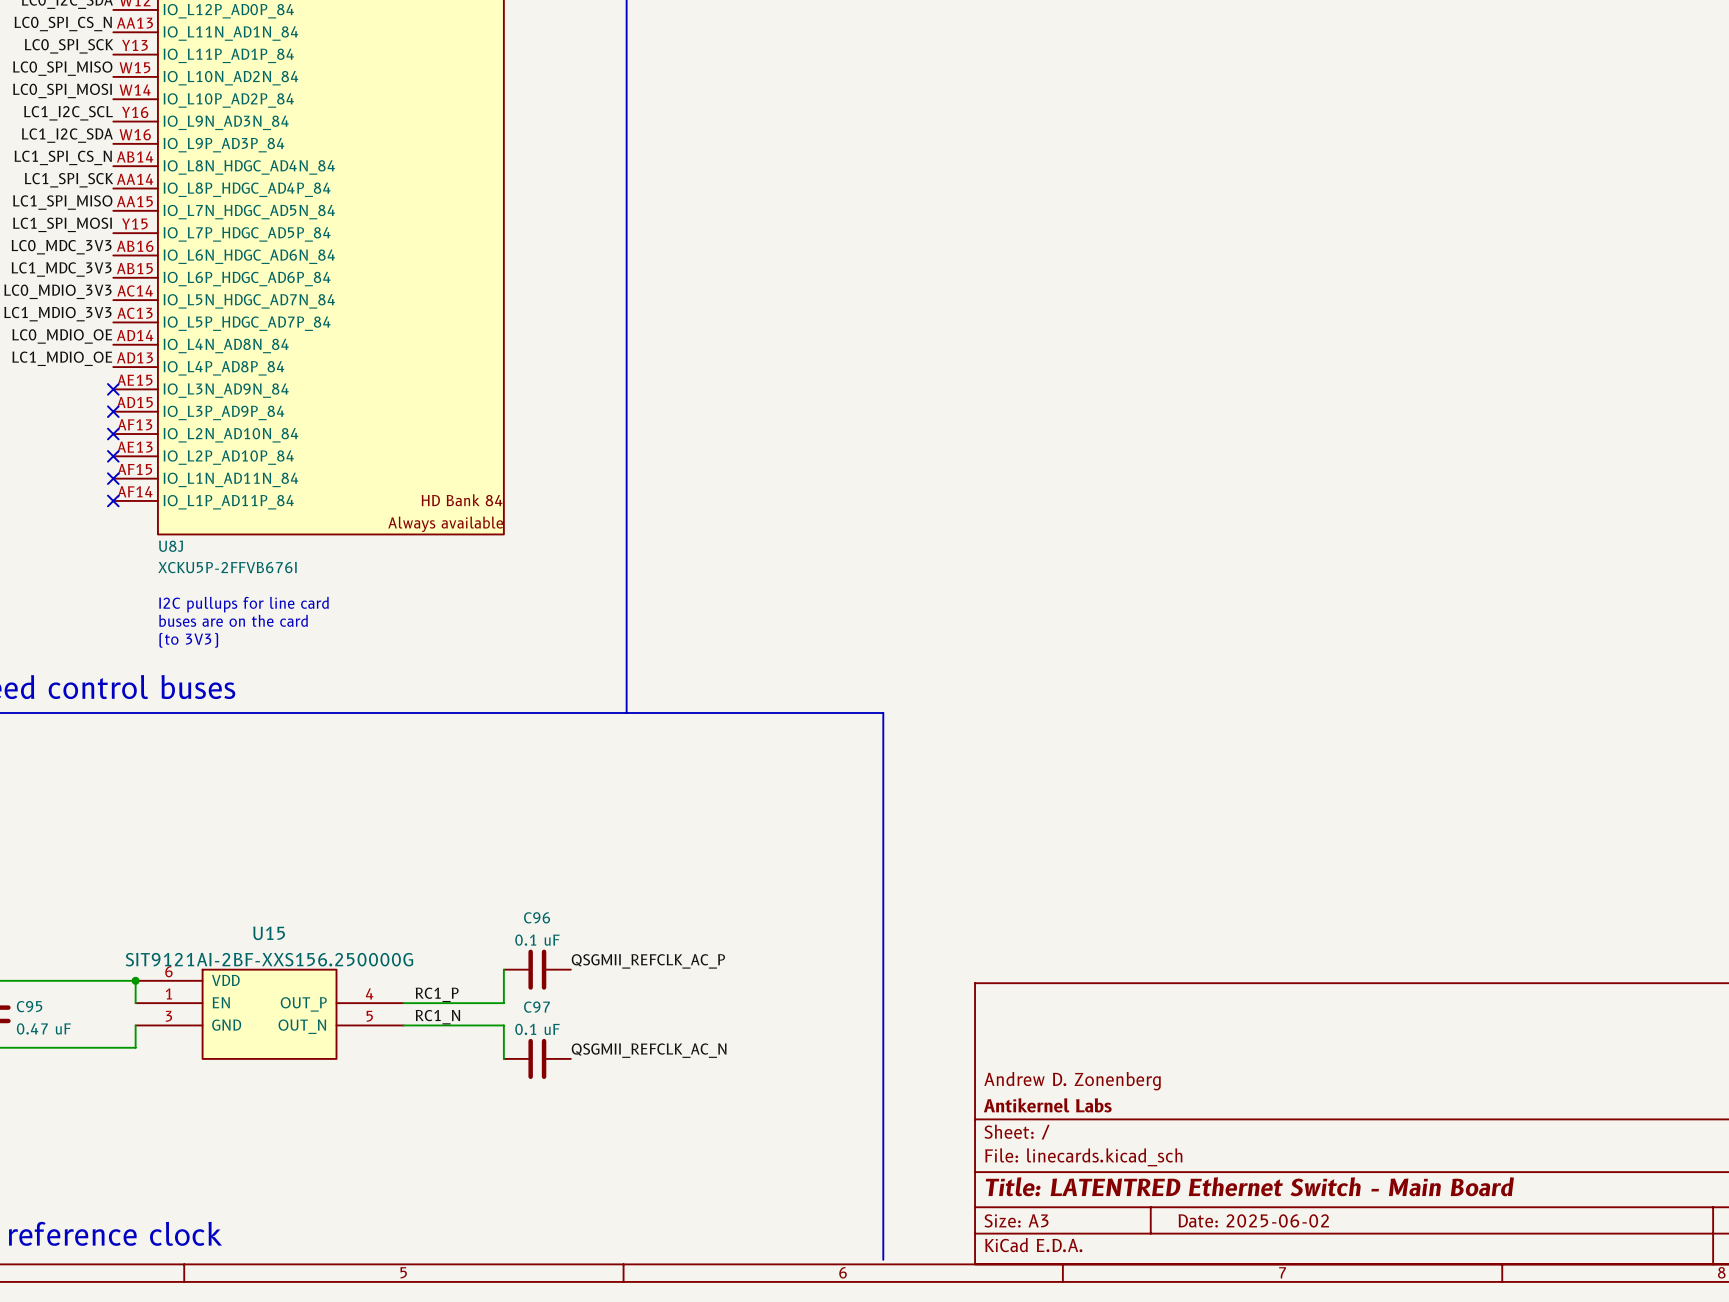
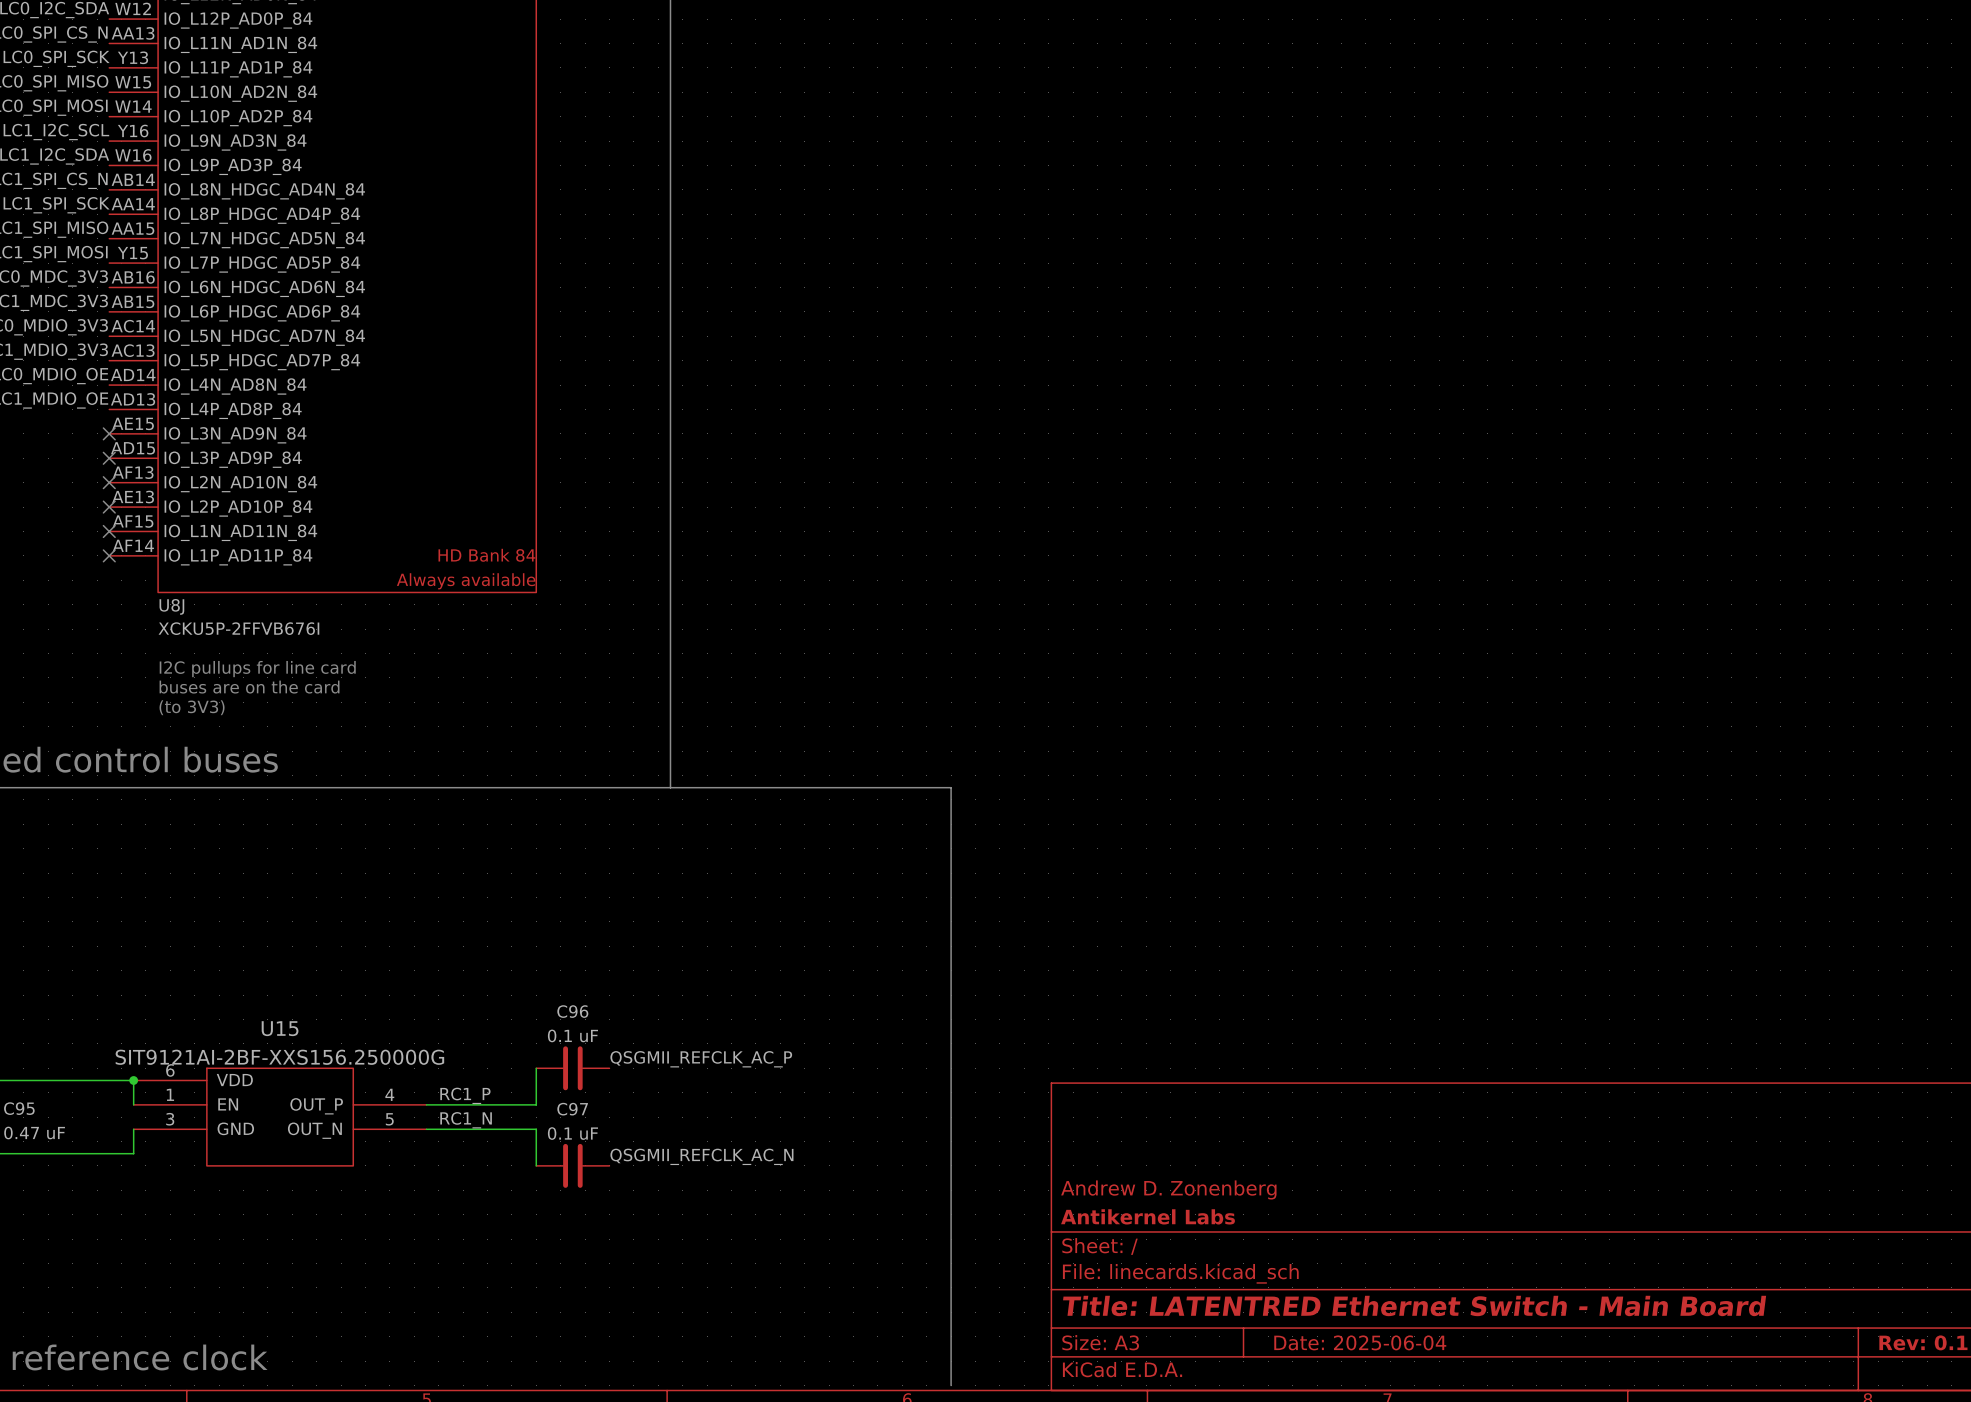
title block: Date: 2025-06-02 (1253, 1220) -> Date: 2025-06-04 (1360, 1342)

